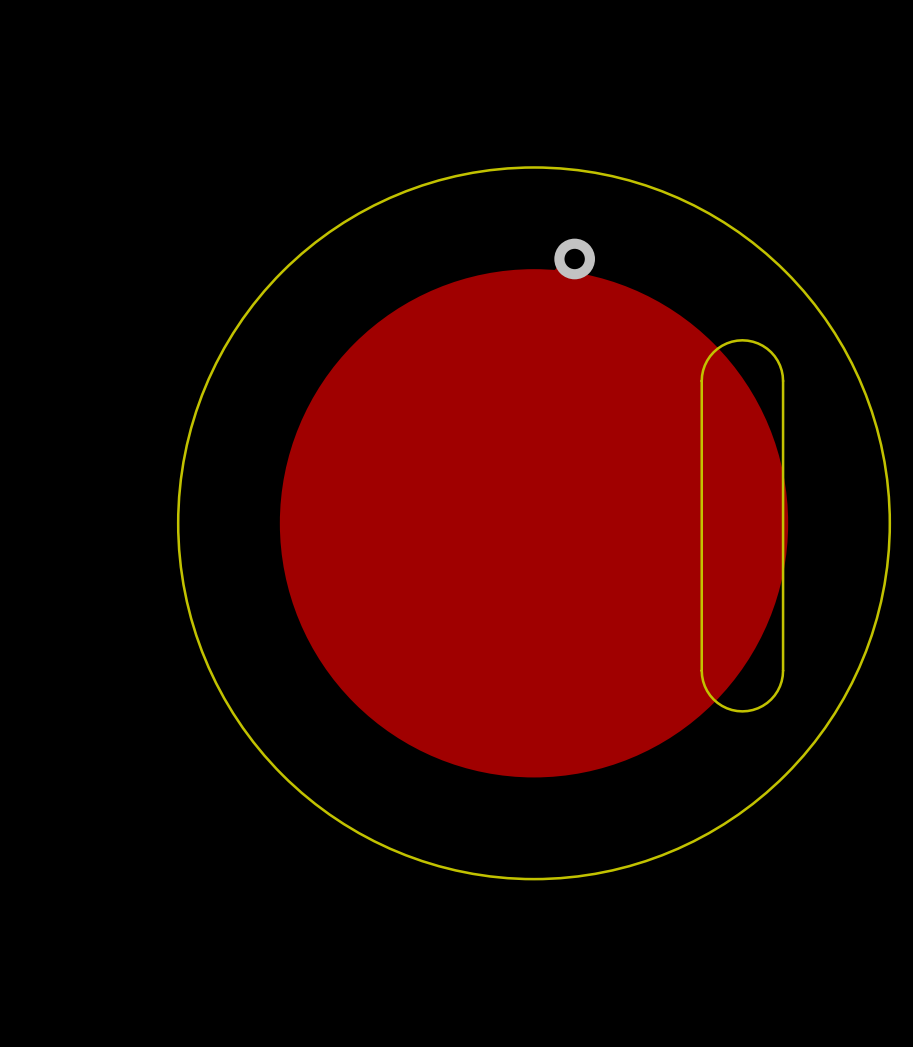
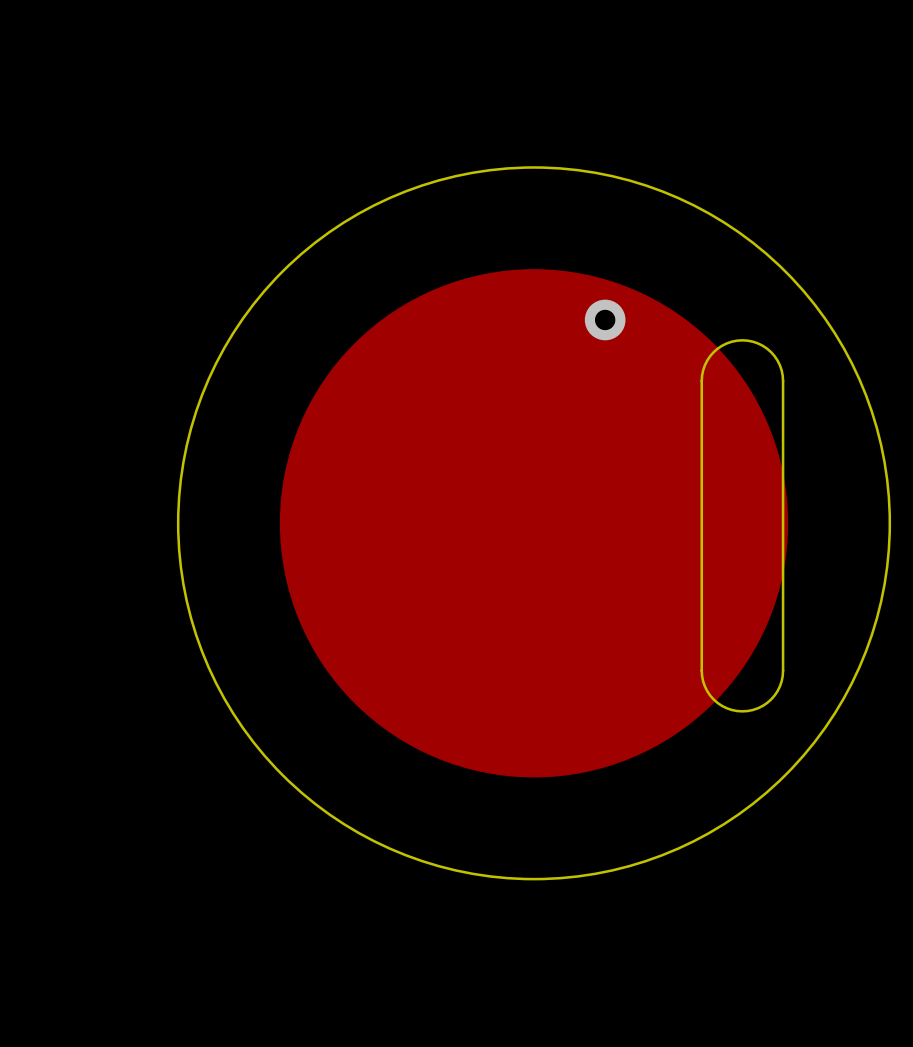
via position: (574, 258) -> (605, 319)

